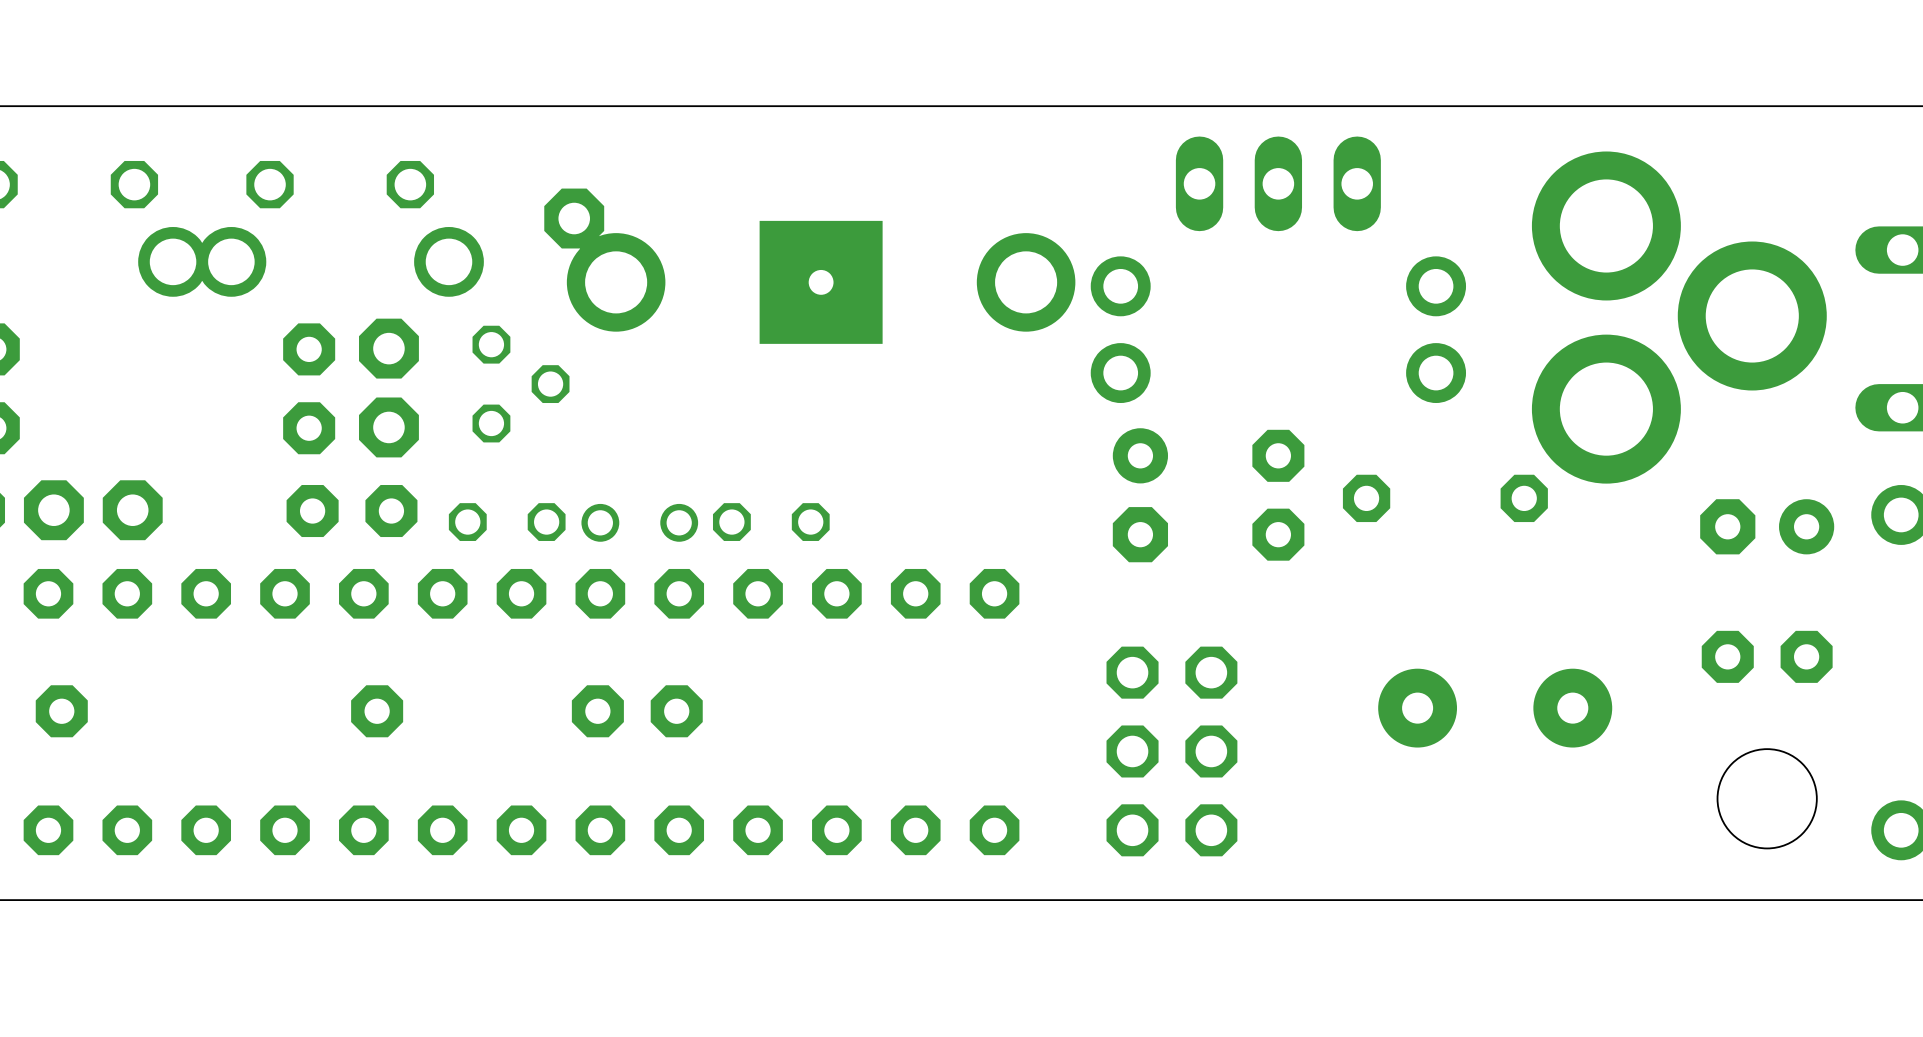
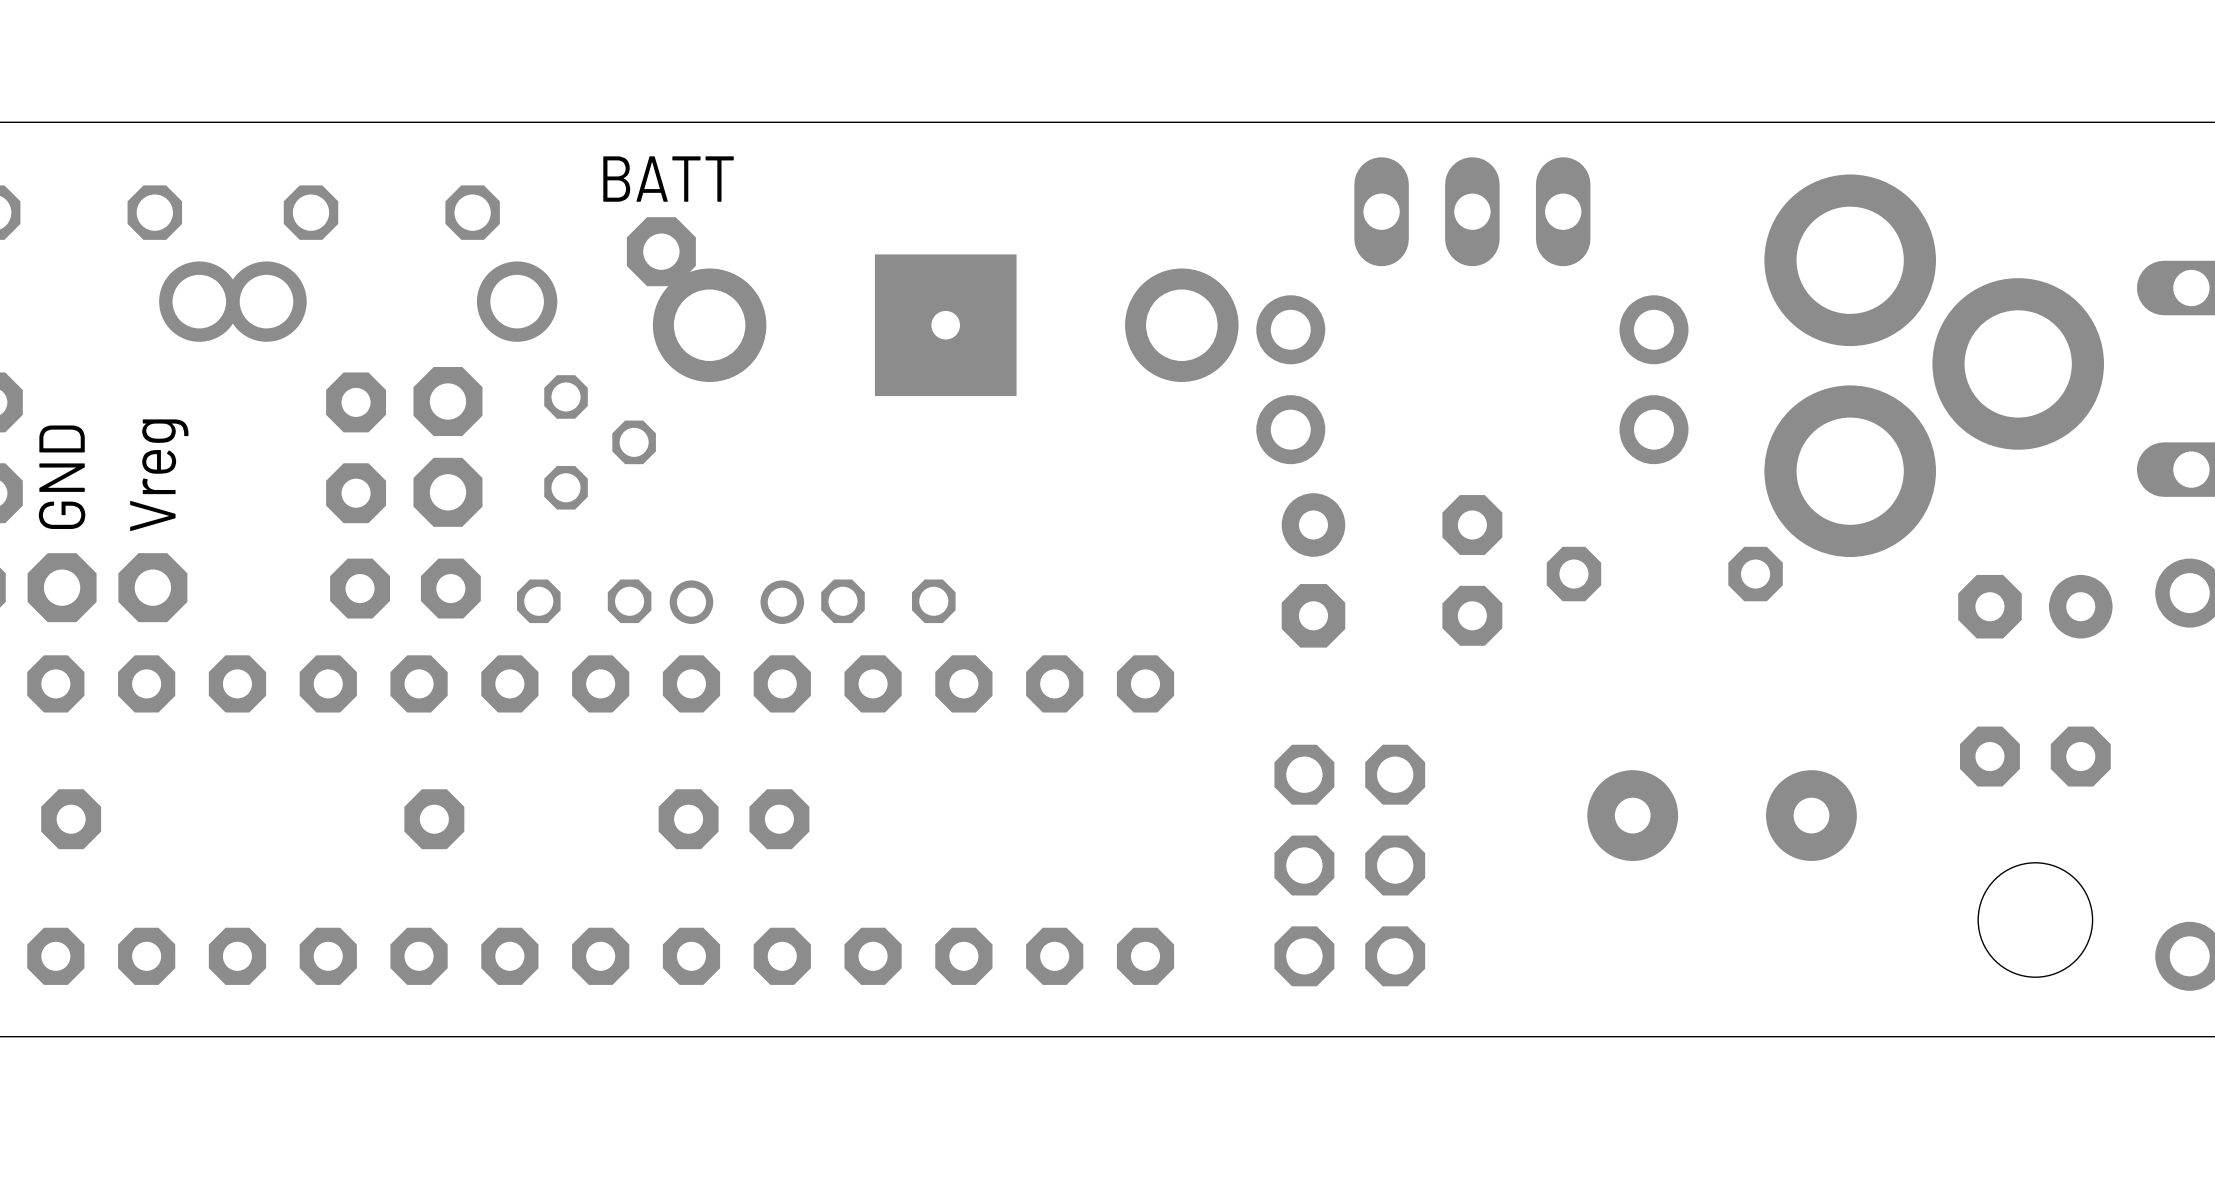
text: none -> BATT (668, 179)
text: none -> Vreg (159, 475)
text: none -> GND (62, 477)

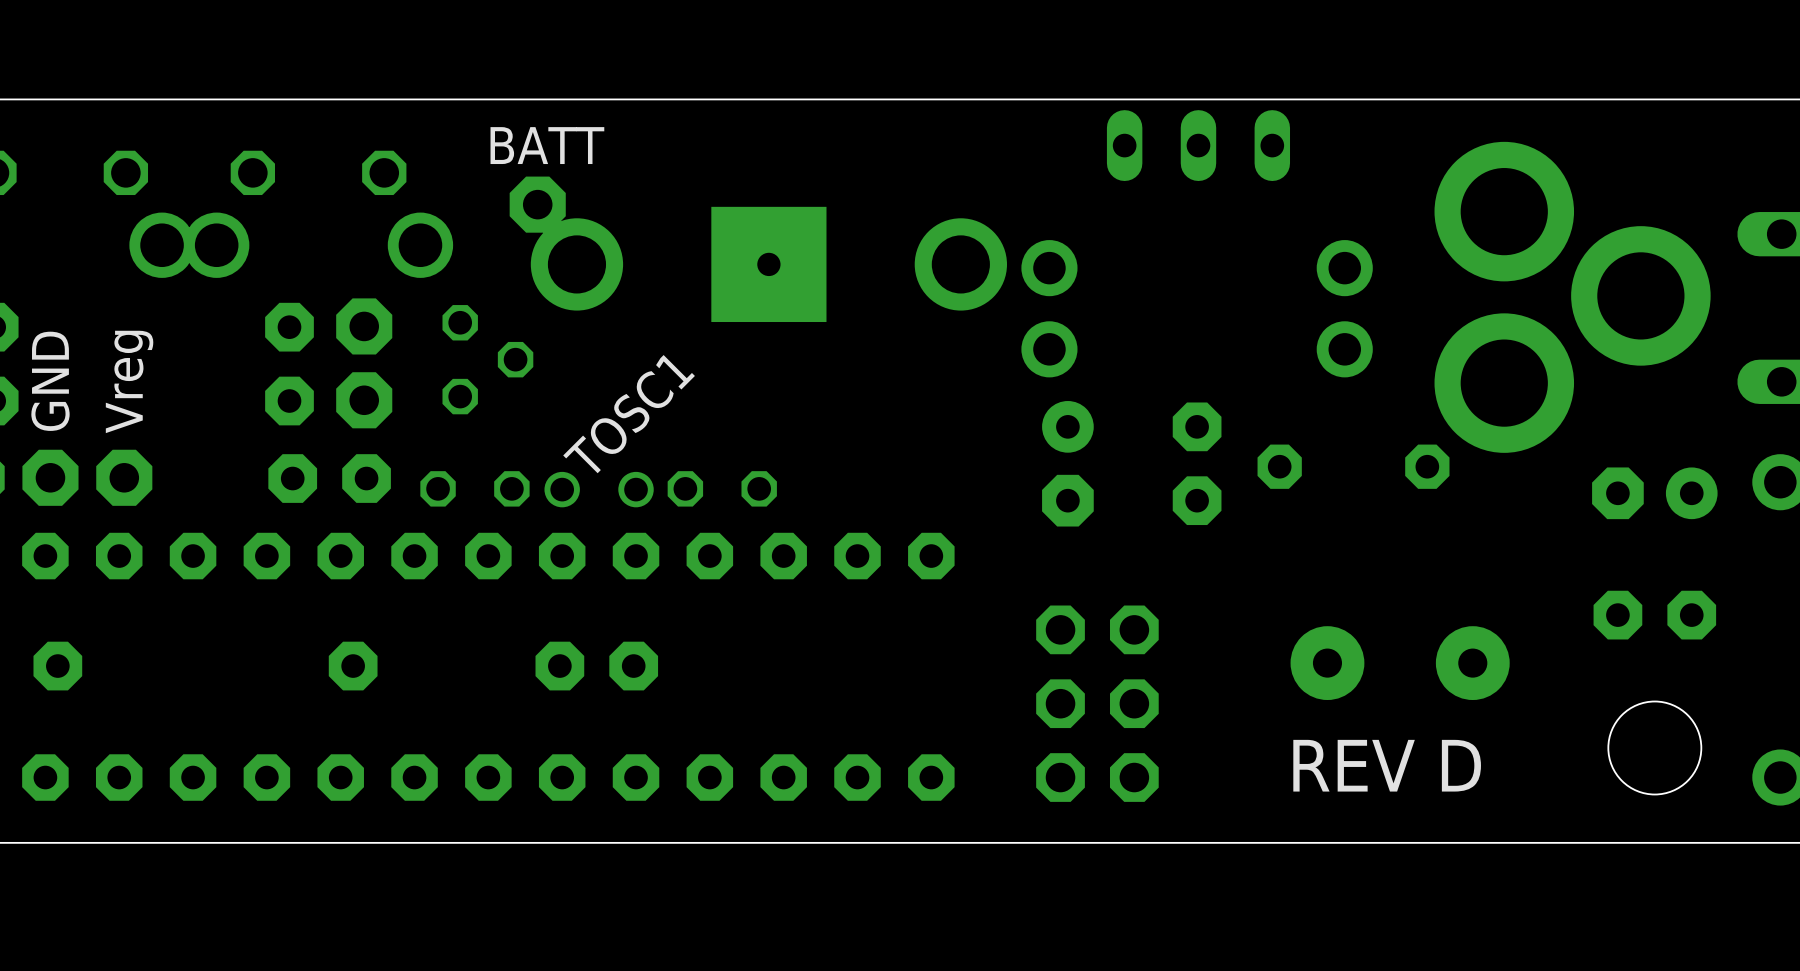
part footprint: [1354, 157, 1591, 267] -> [1106, 110, 1291, 182]
text: none -> TOSC1 (629, 414)
text: none -> REV D (1387, 765)

